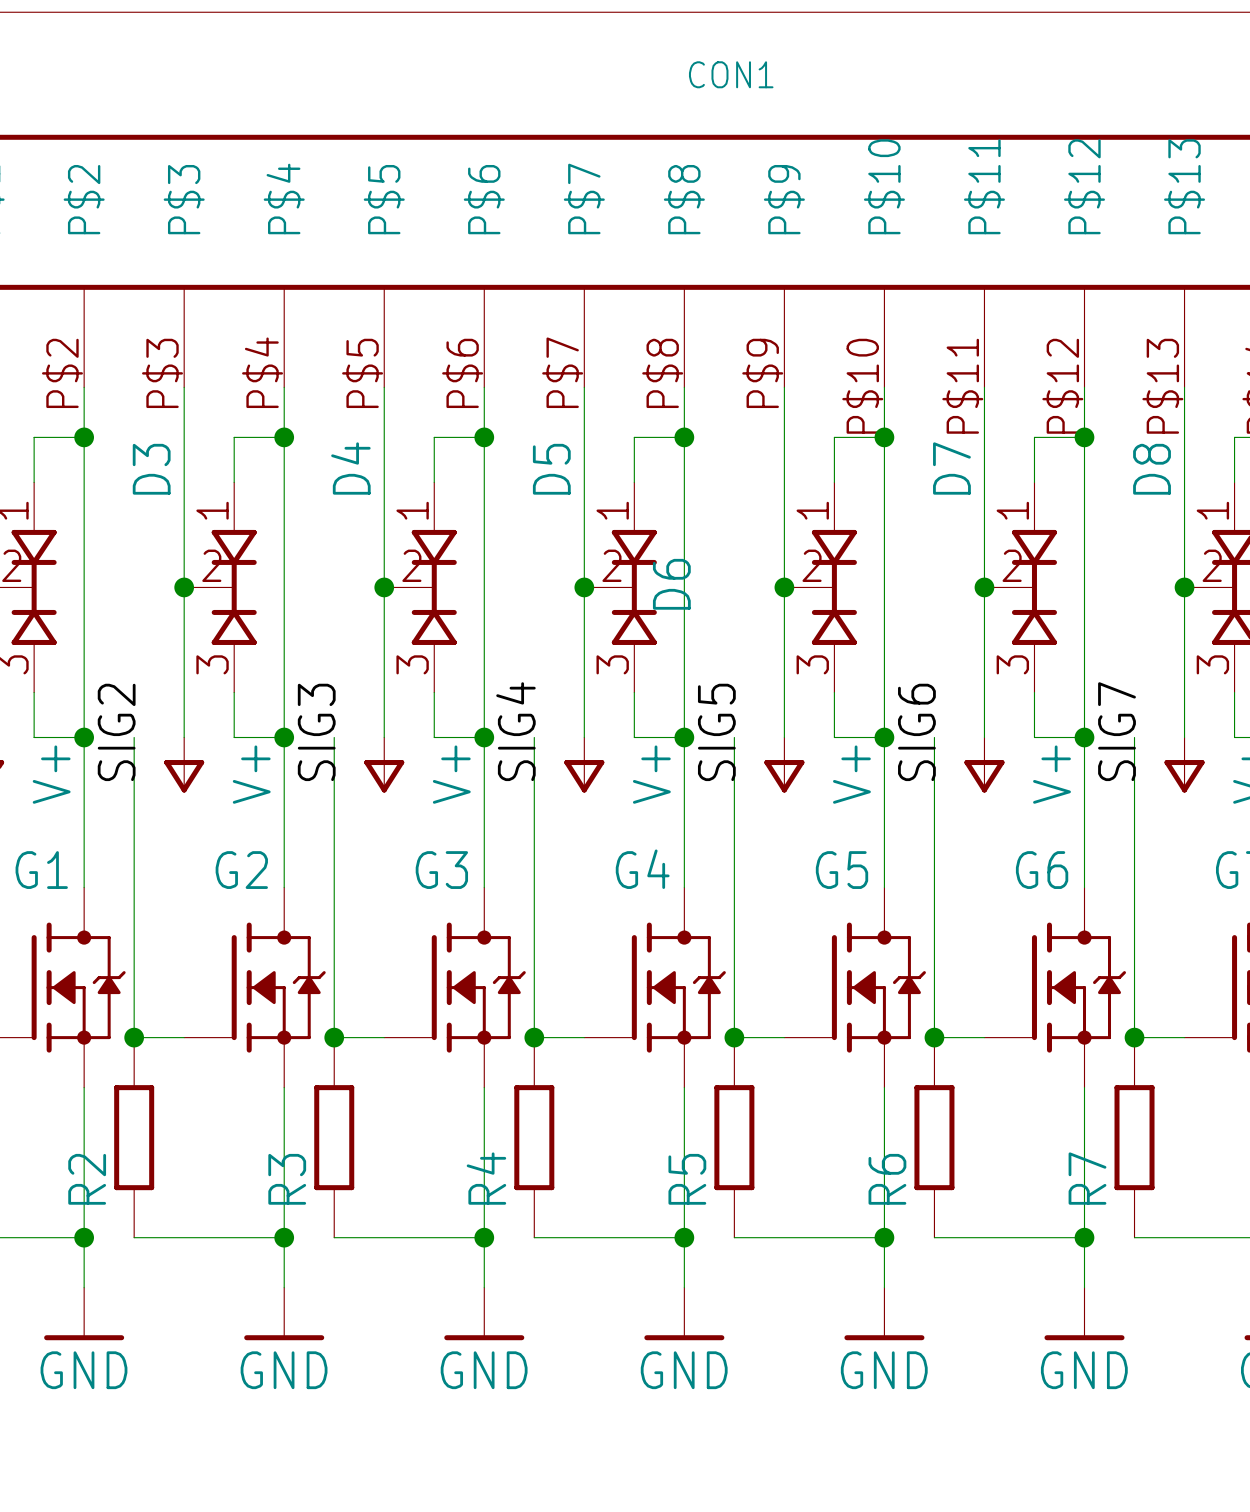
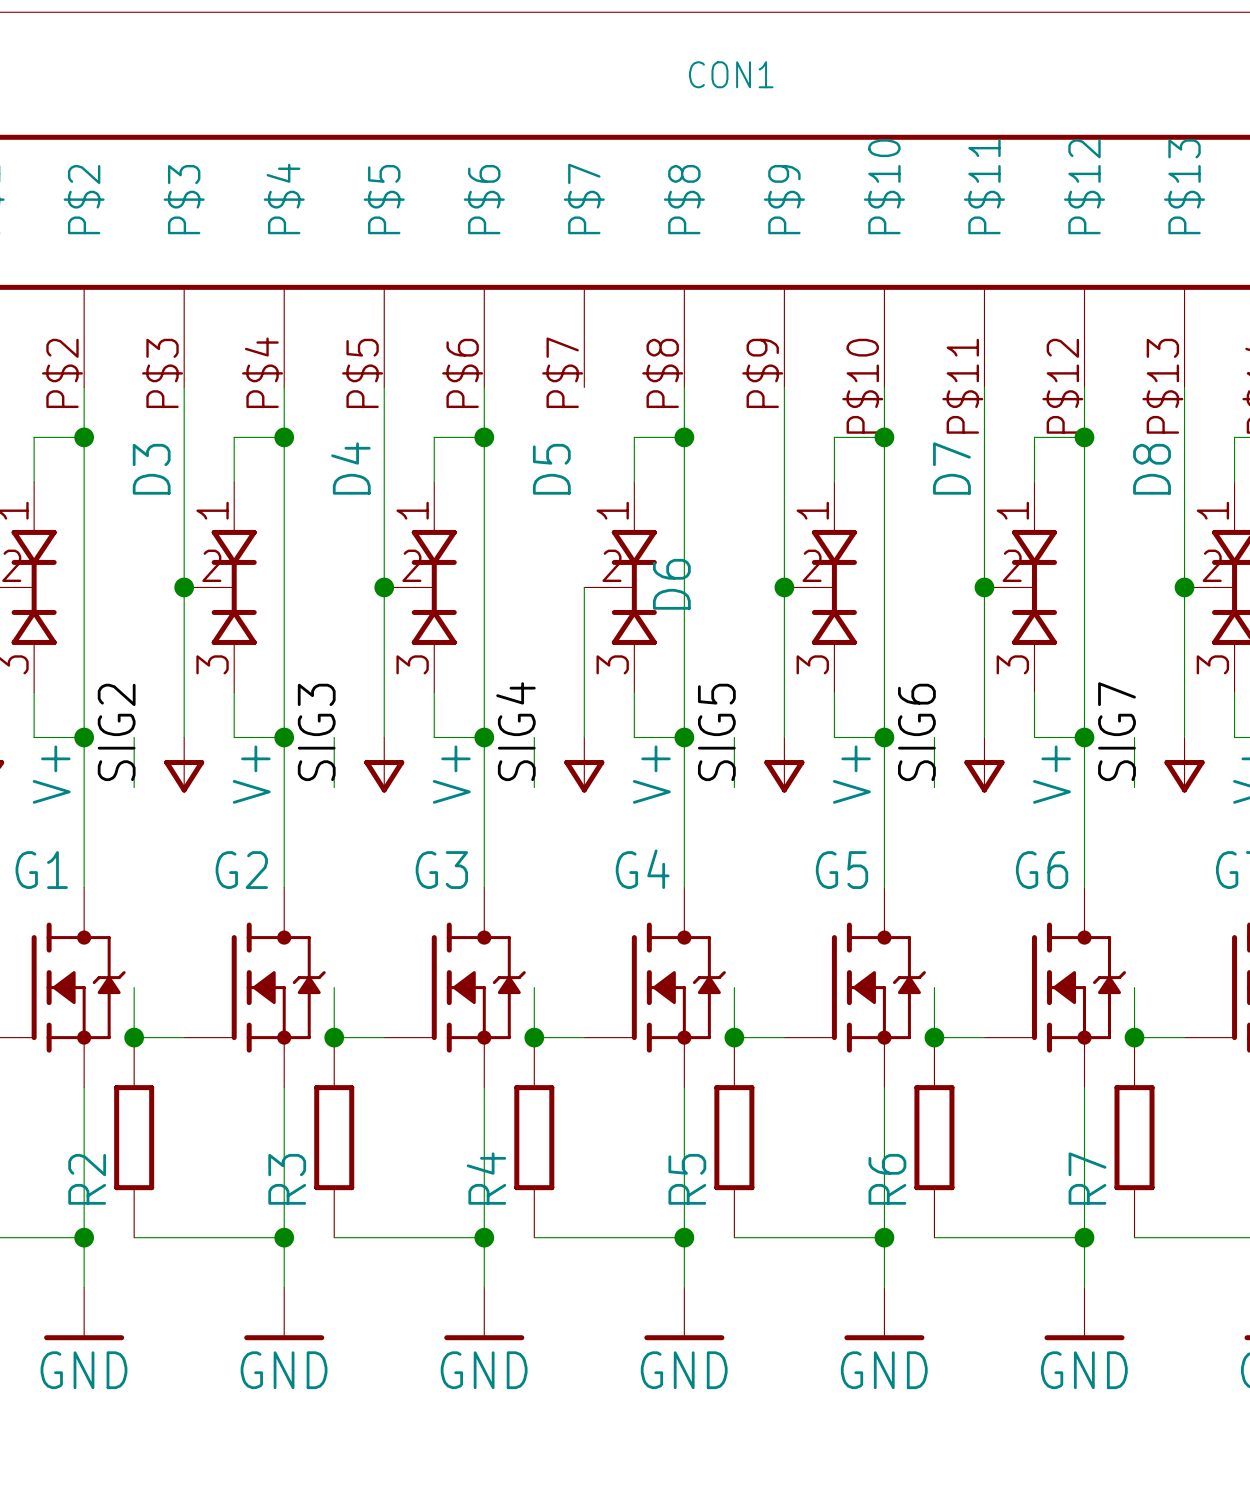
wire: (584, 387) (584, 587) -> none
junction: (584, 587) -> none
wire: (134, 787) (134, 987) -> none
wire: (334, 787) (334, 987) -> none
wire: (534, 787) (534, 987) -> none
wire: (734, 787) (734, 987) -> none
wire: (934, 787) (934, 987) -> none
wire: (1134, 787) (1134, 987) -> none

